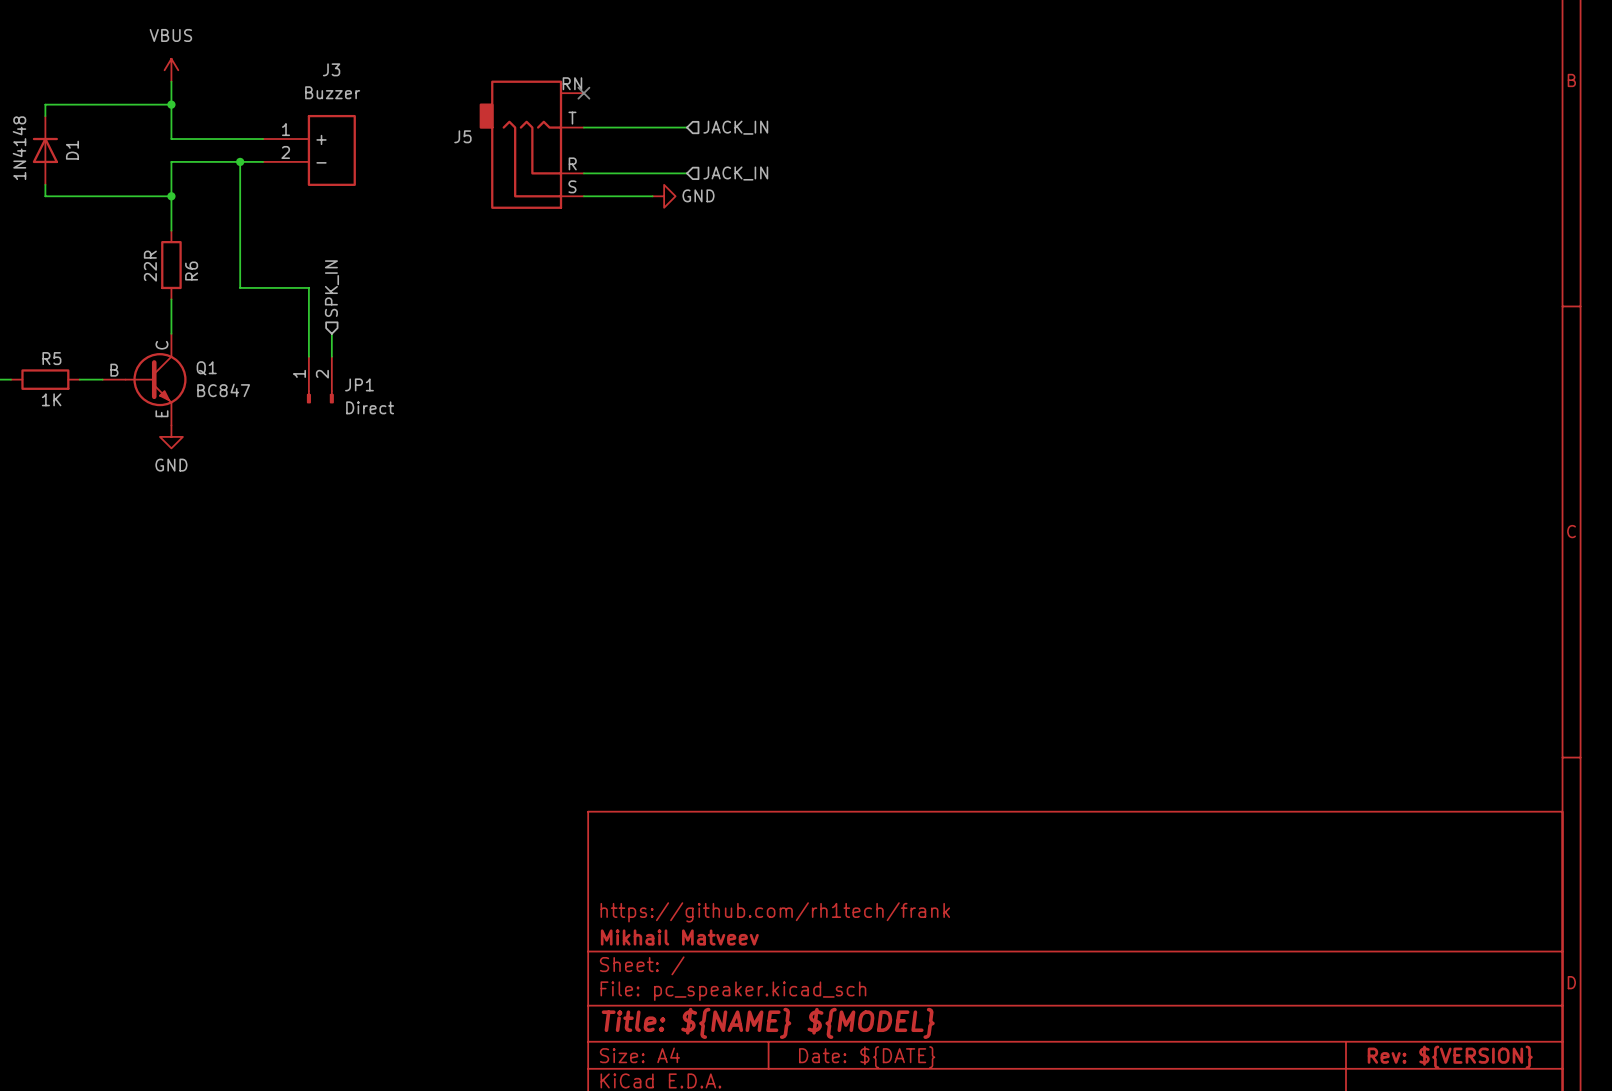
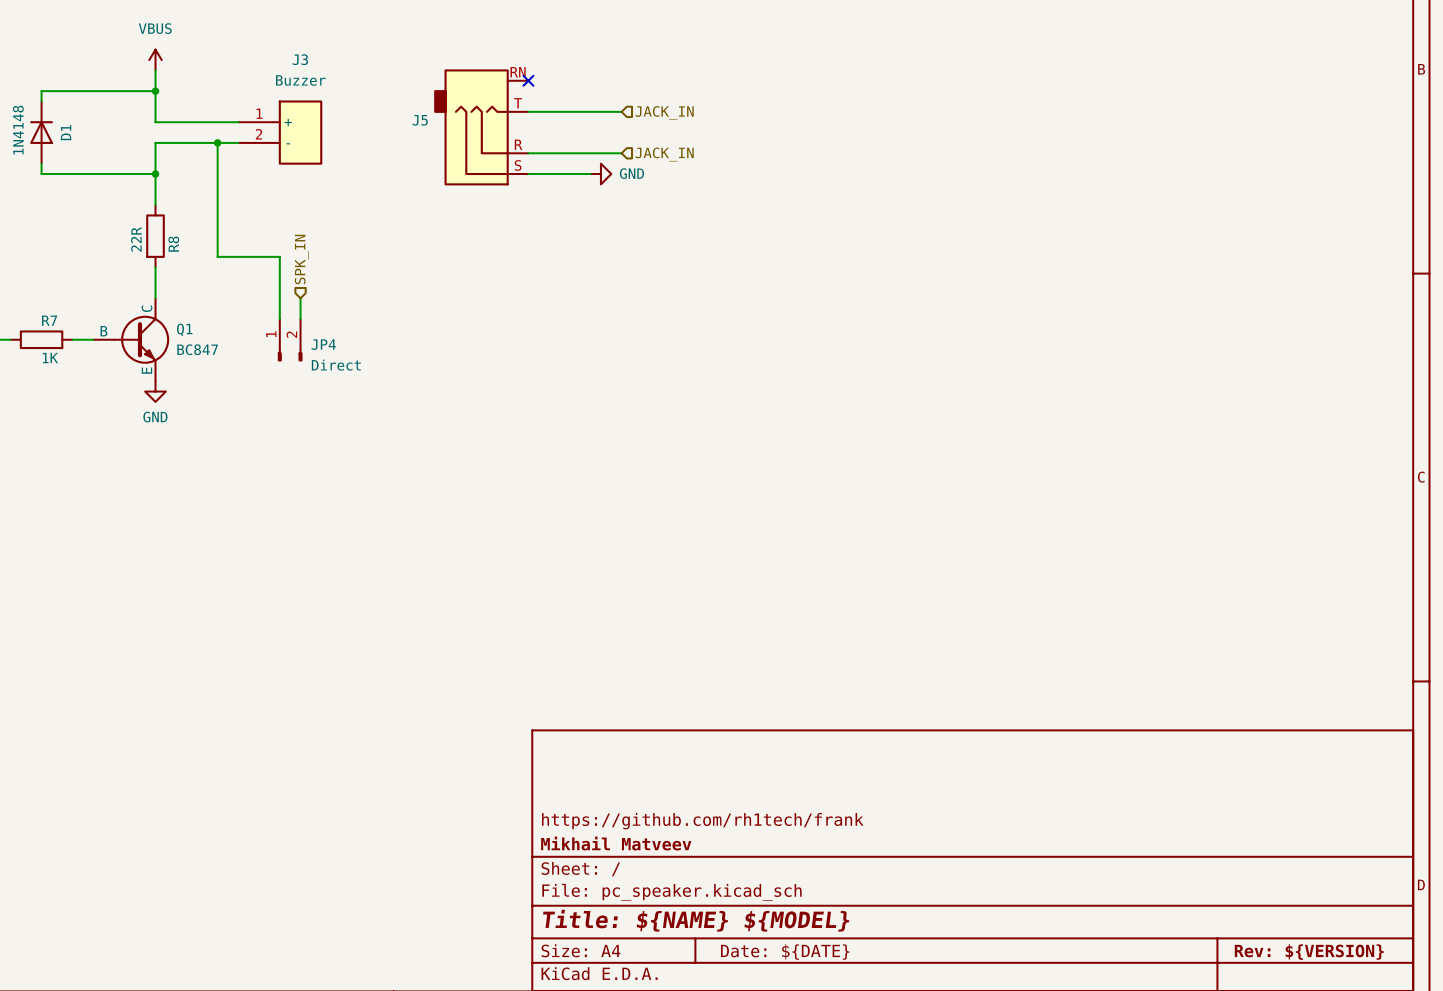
R6 name: R6 (191, 271) -> R8 (173, 244)
R5 name: R5 (51, 358) -> R7 (49, 320)
JP1 name: JP1 (359, 384) -> JP4 (323, 344)

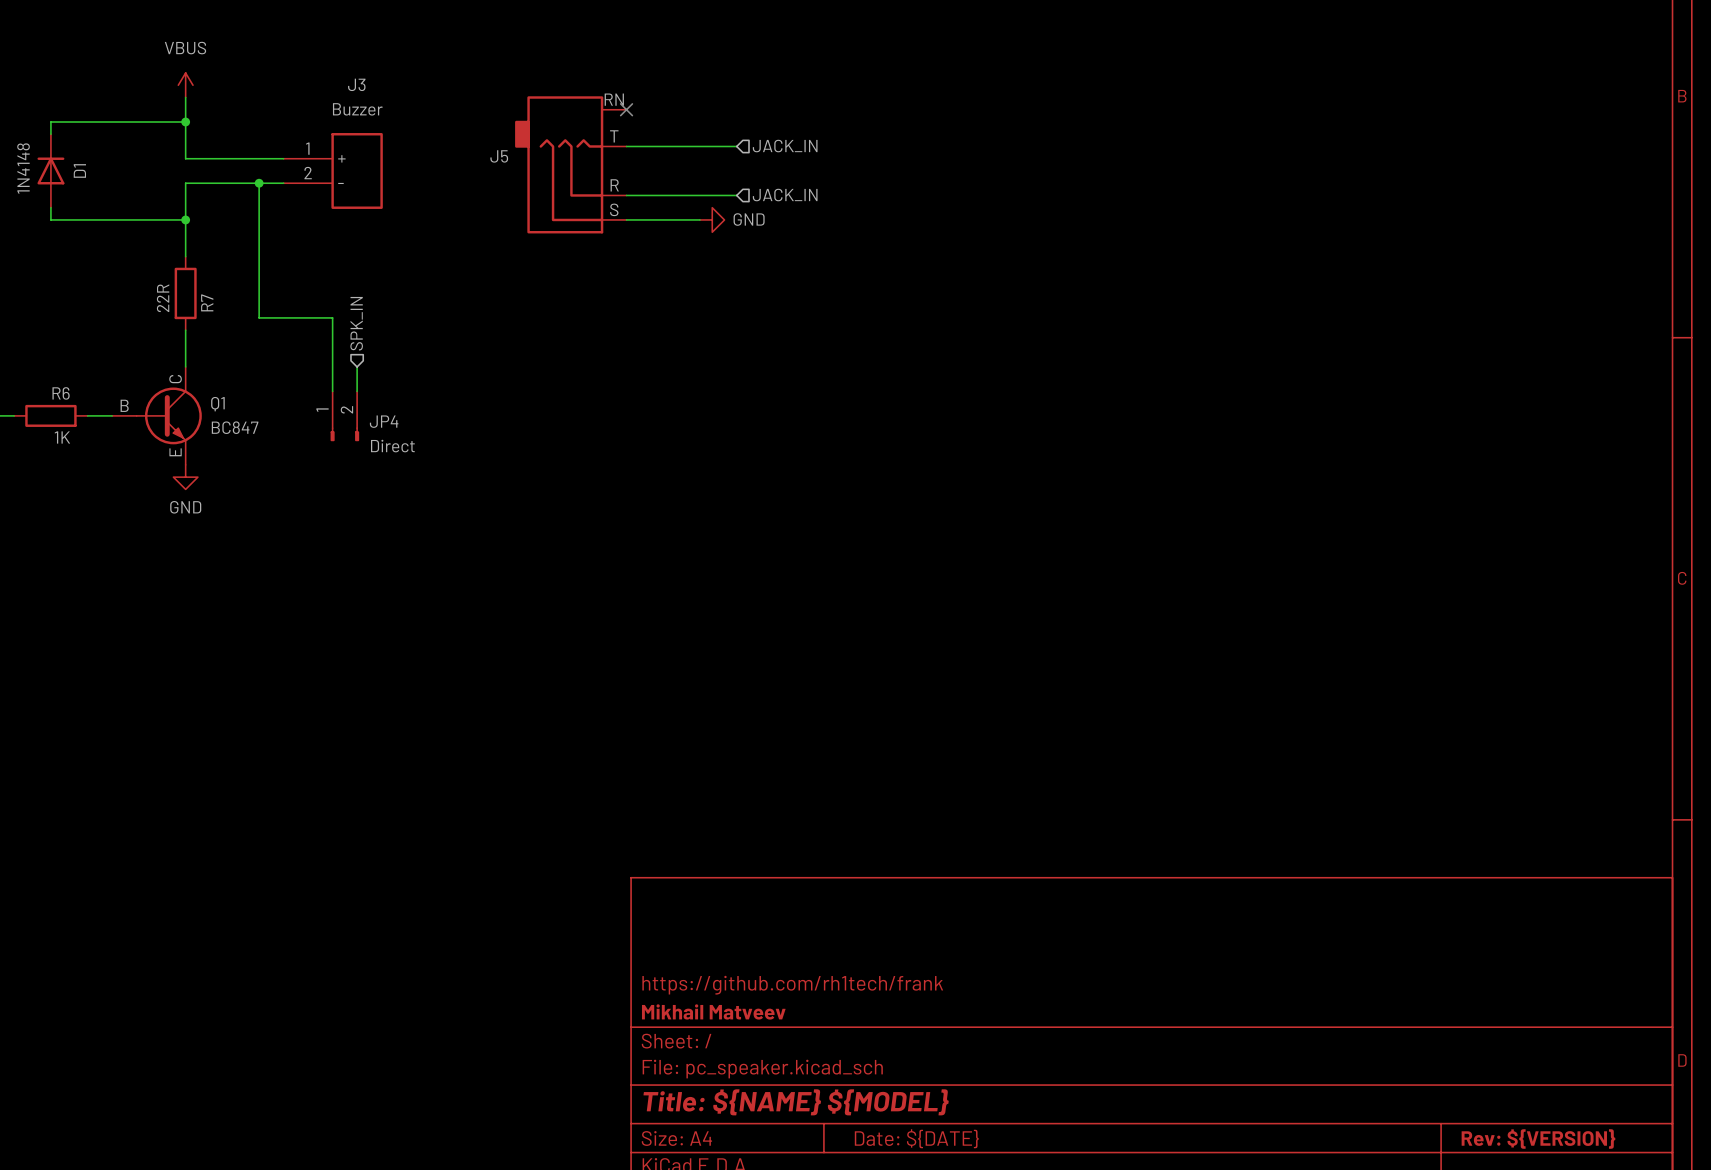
R8 name: R8 (173, 244) -> R7 (207, 302)
R7 name: R7 (49, 320) -> R6 (61, 393)

